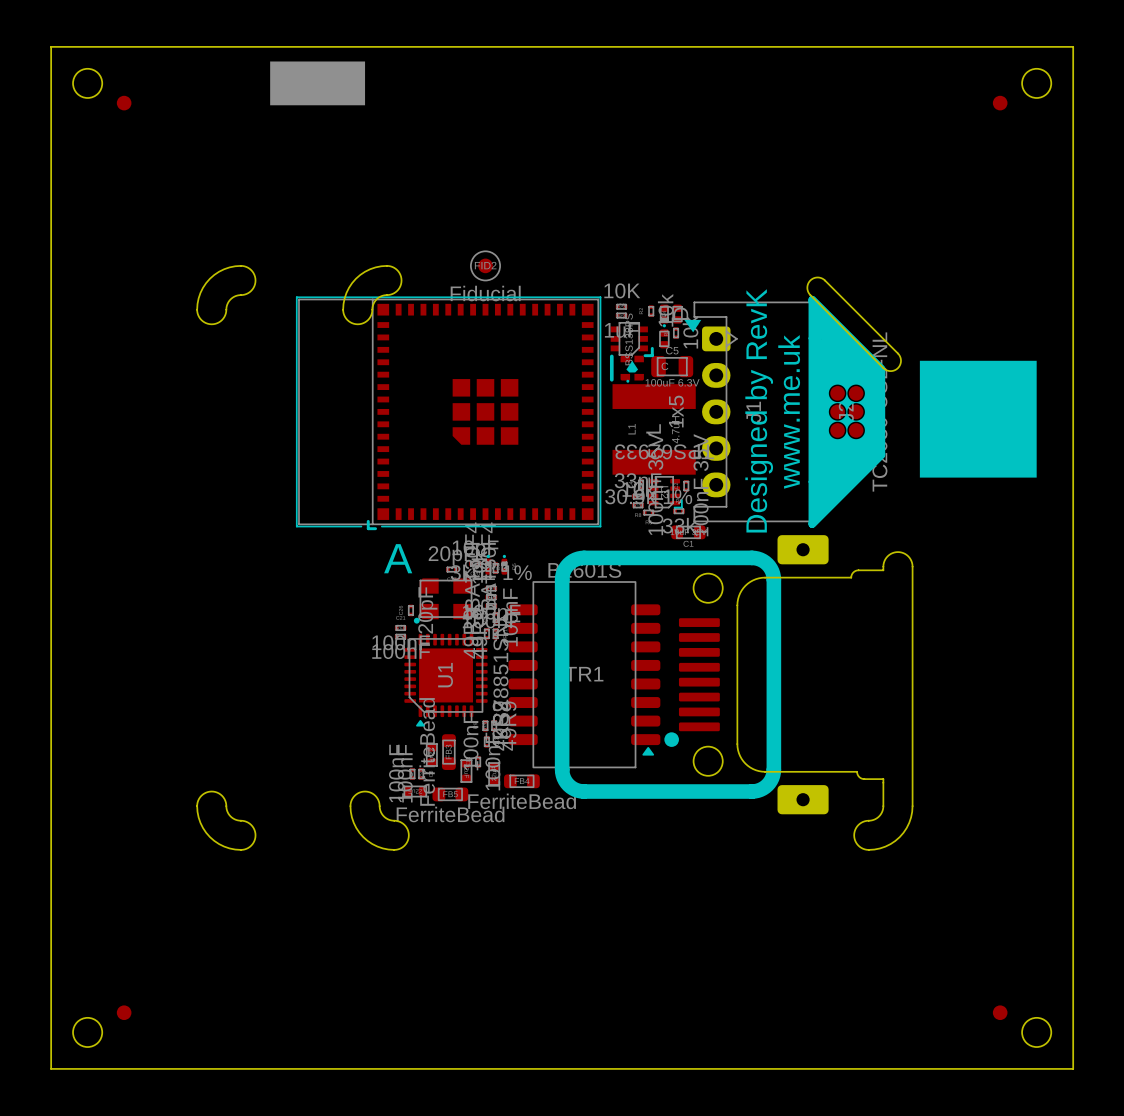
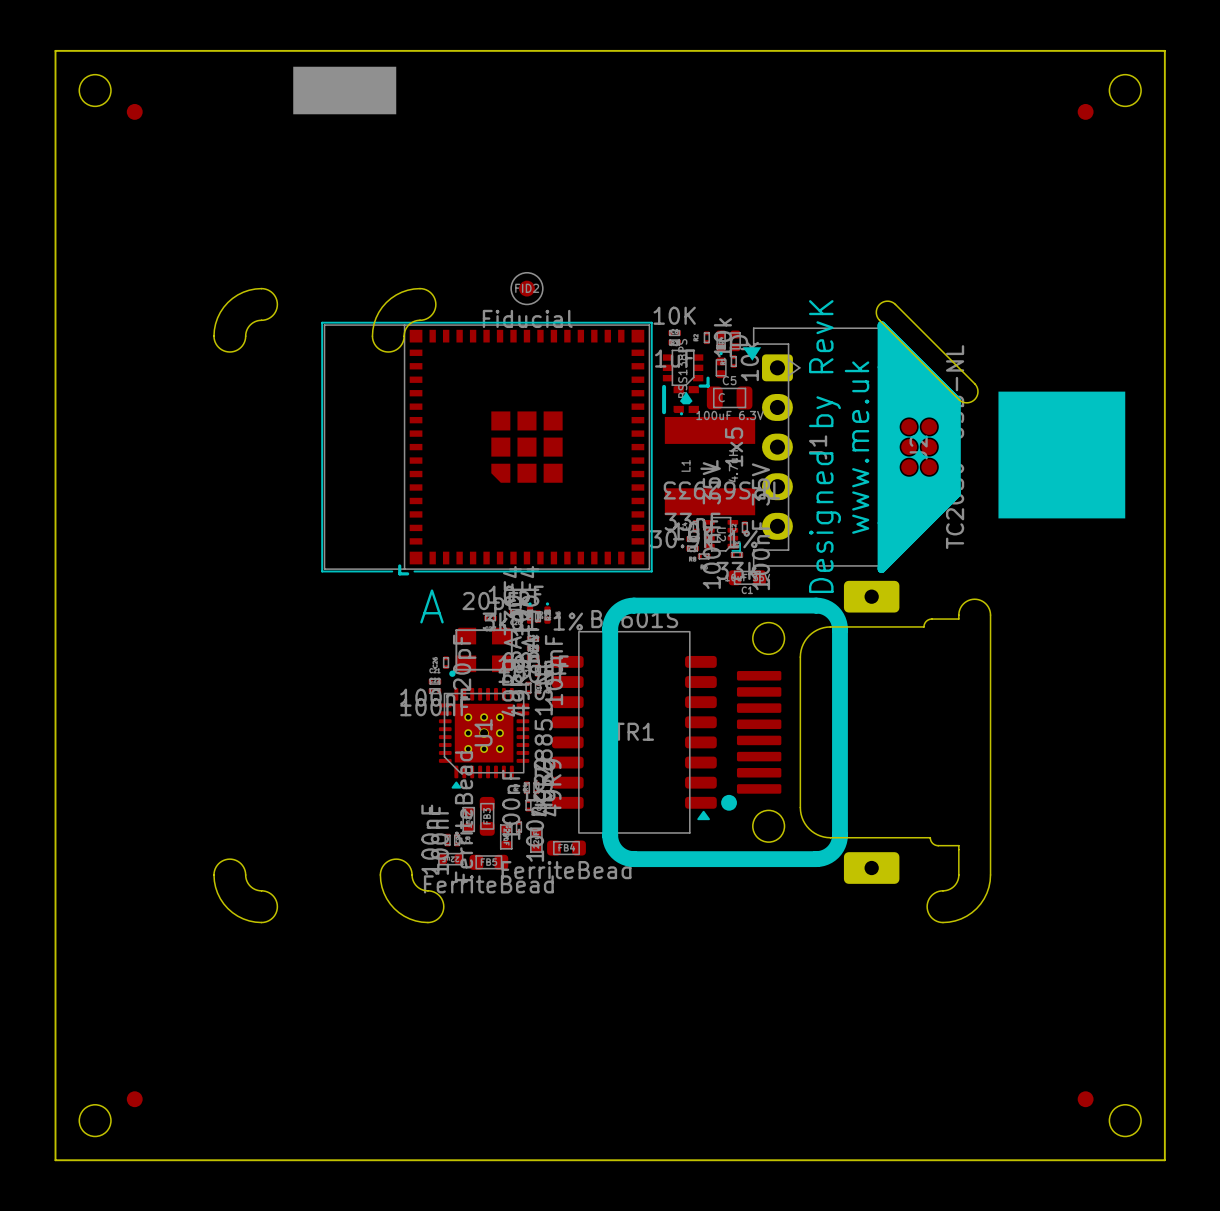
U1 footprint: [404, 633, 488, 727] -> [438, 687, 530, 789]

